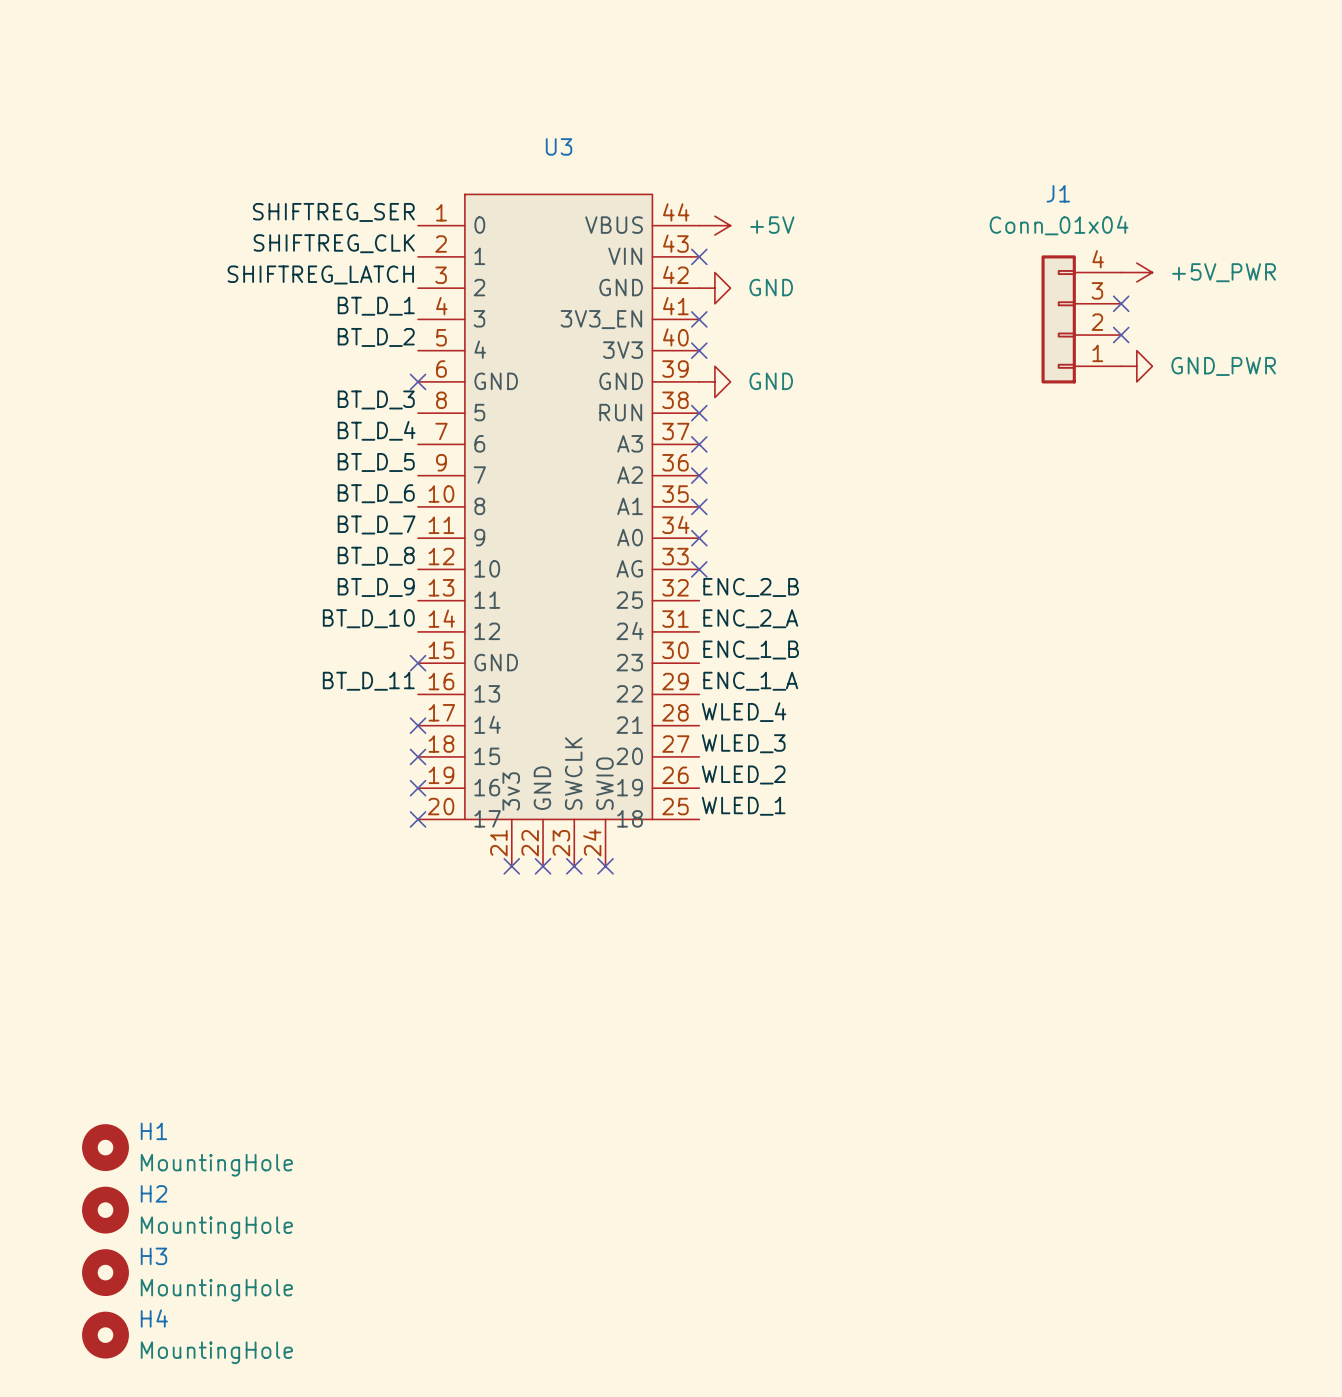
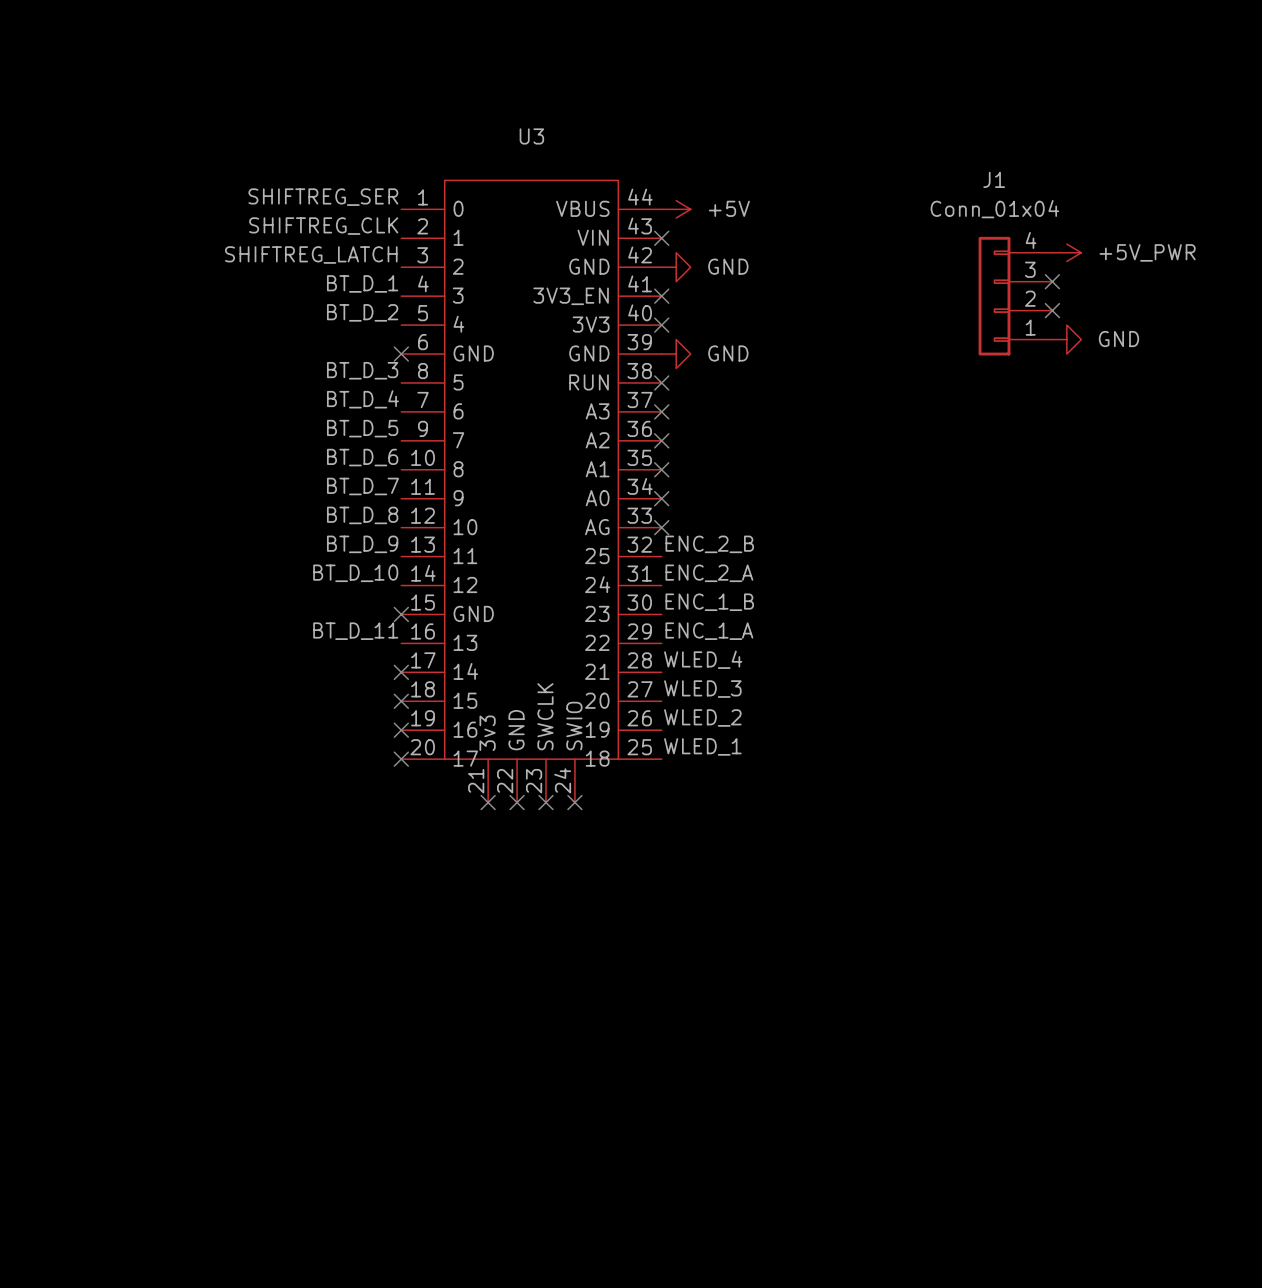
power symbol: GND_PWR (1136, 366) -> GND (1066, 339)
H1: MountingHole (105, 1147) -> none
H2: MountingHole (105, 1210) -> none
H3: MountingHole (105, 1272) -> none
H4: MountingHole (105, 1335) -> none

